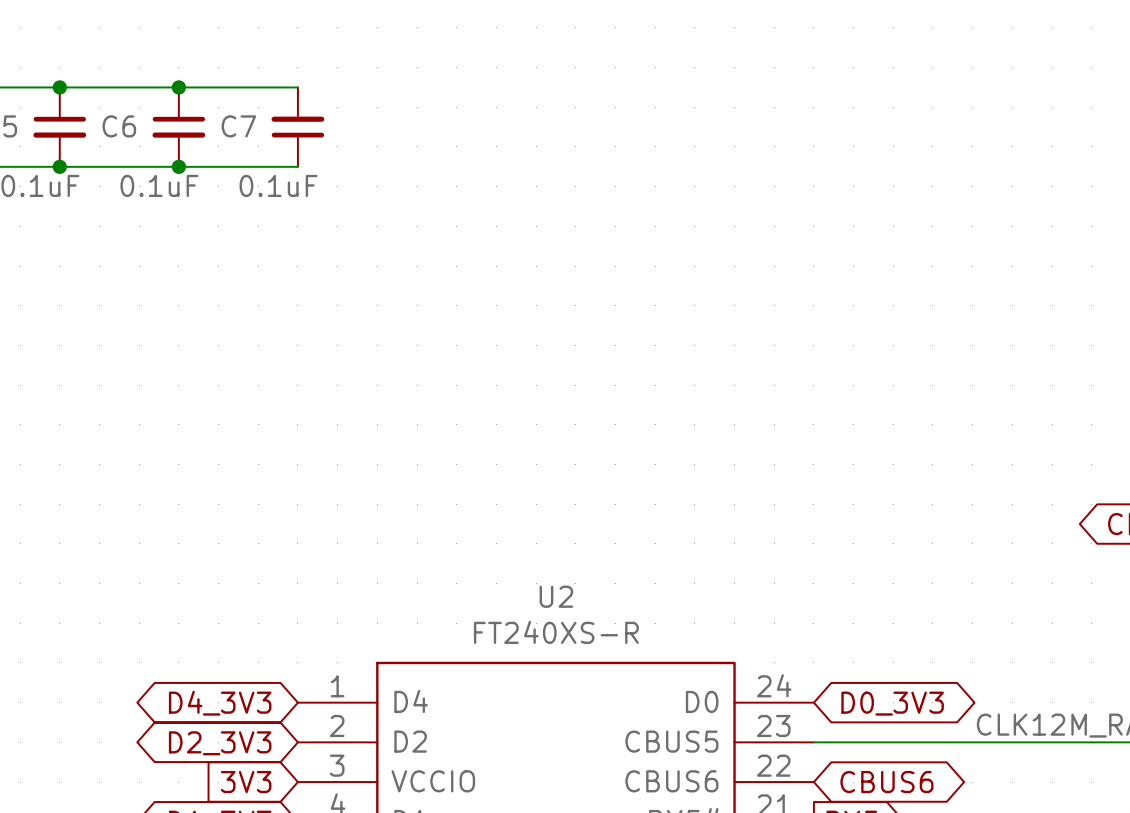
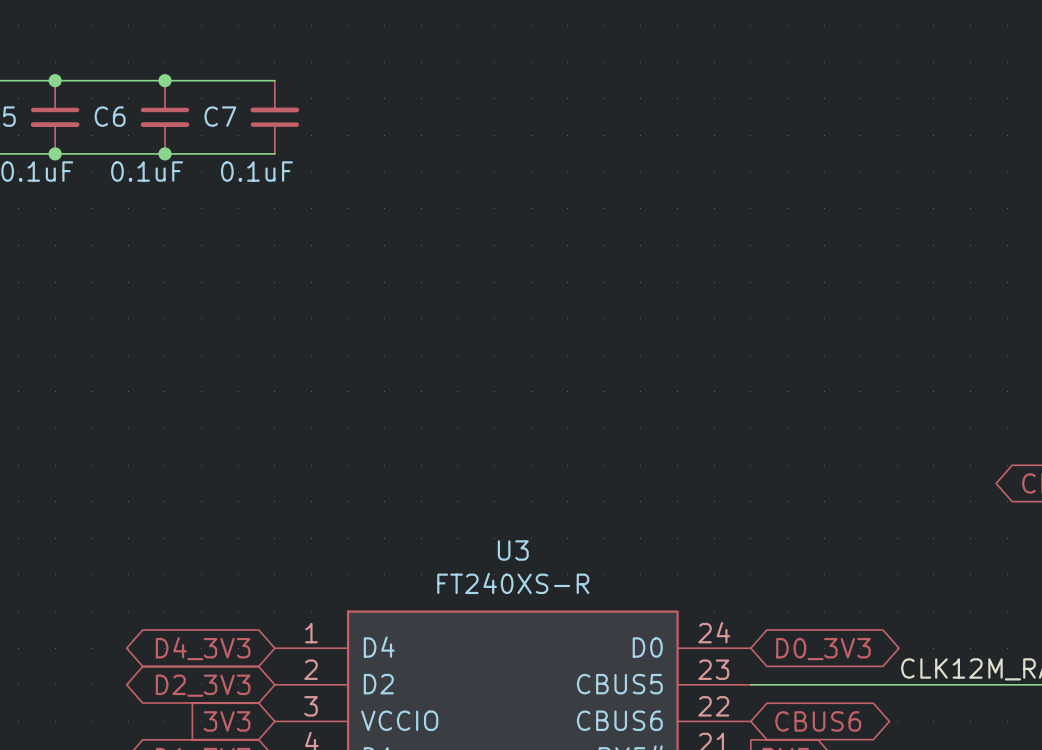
U2 name: U2 (556, 596) -> U3 (513, 550)

